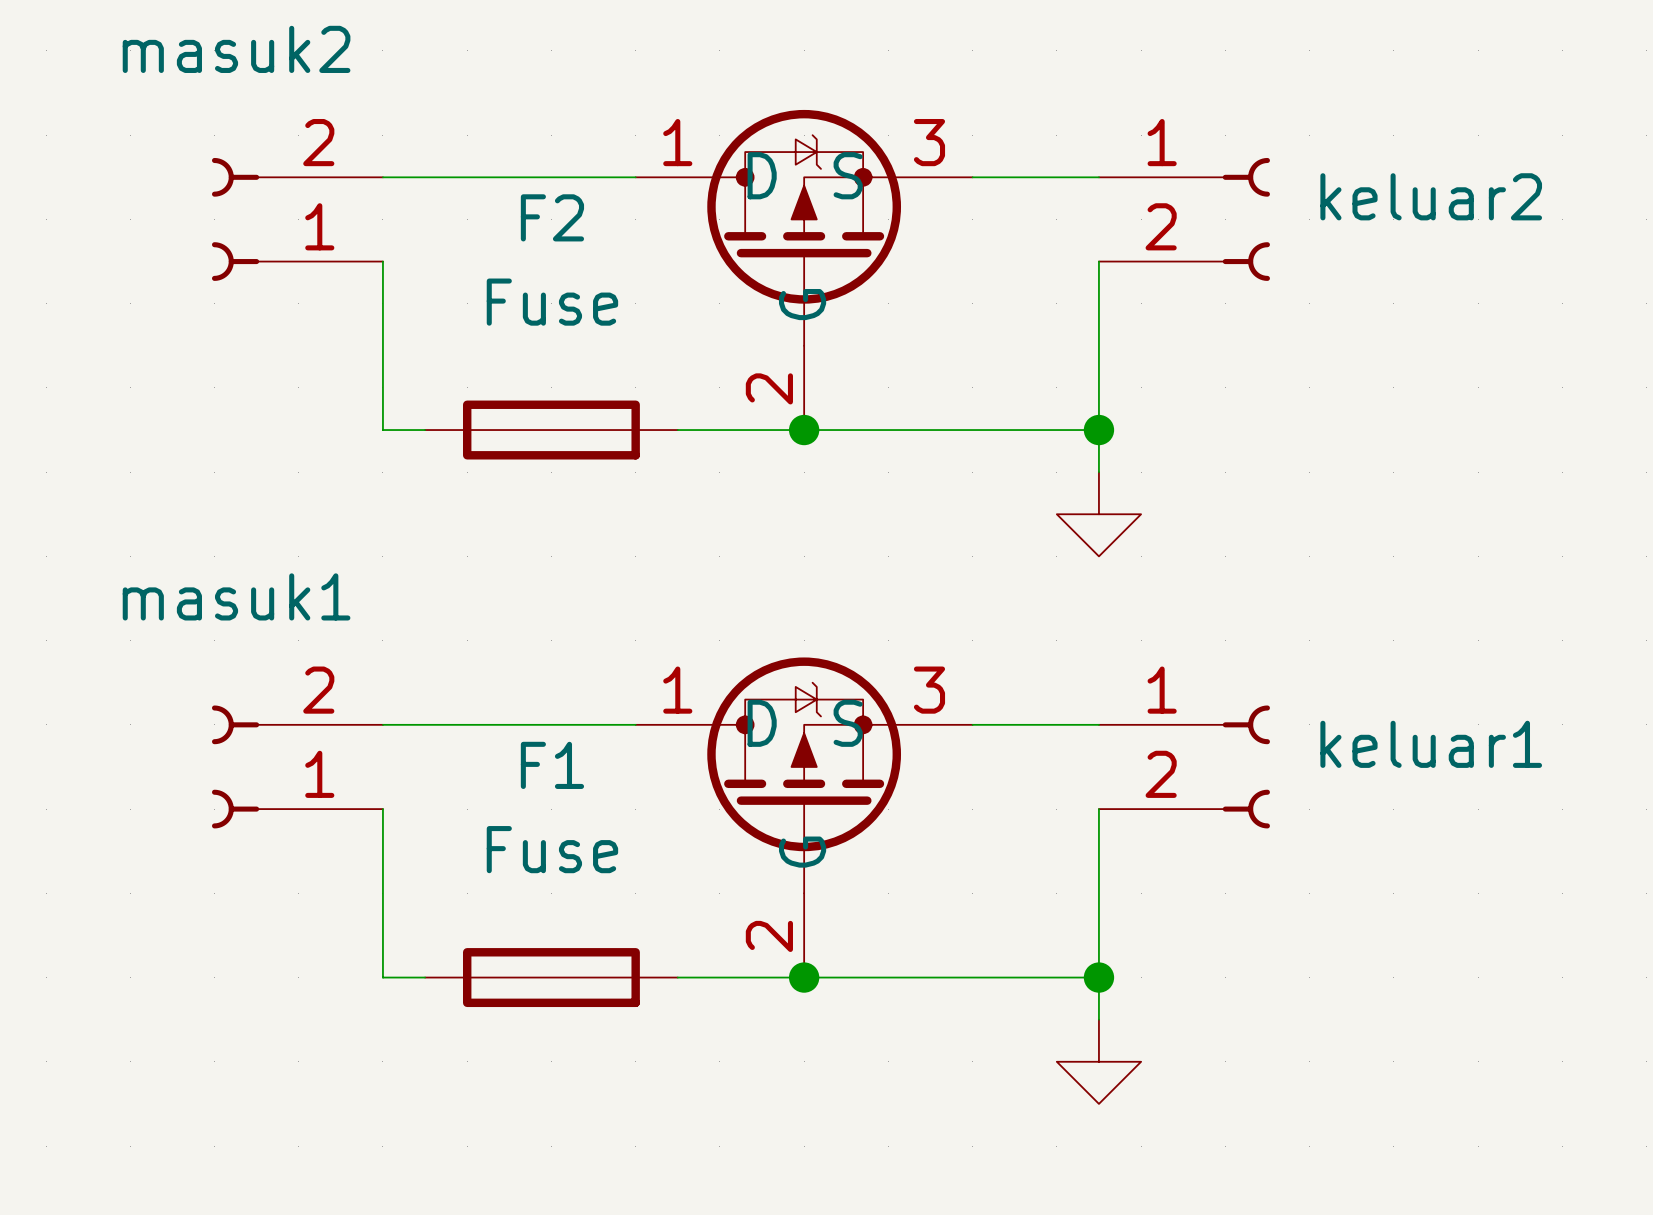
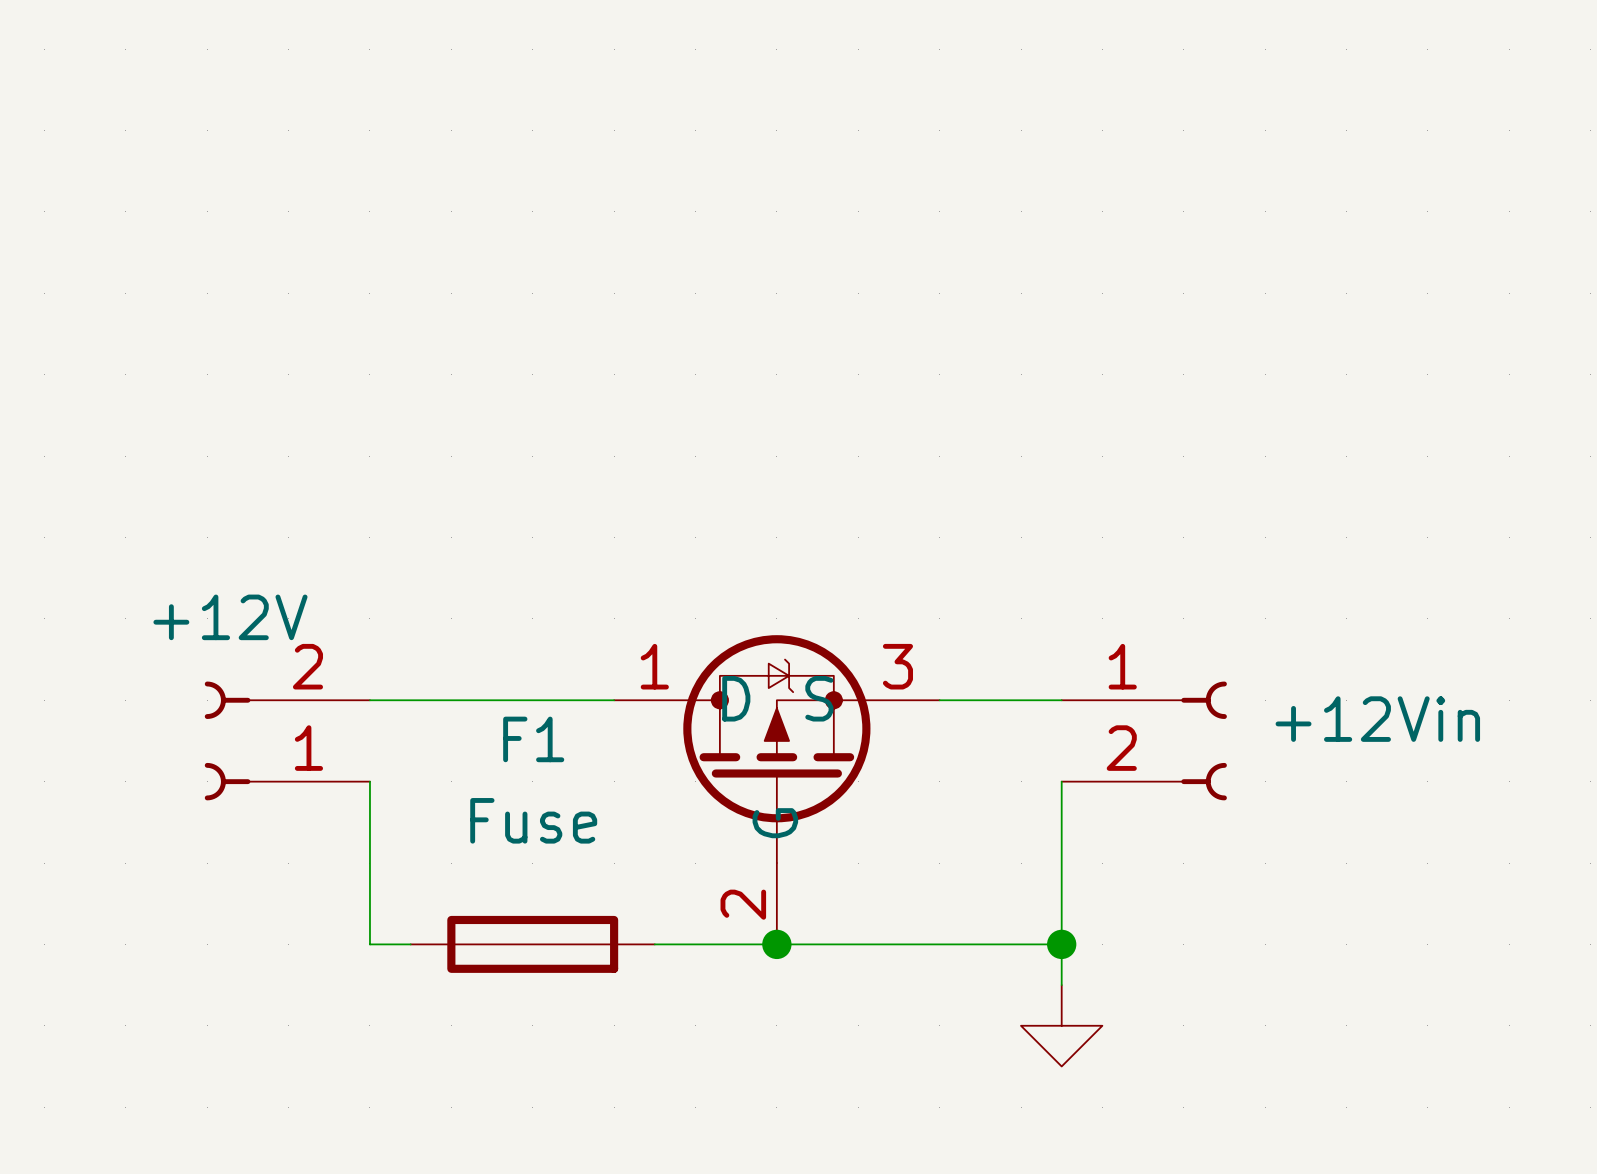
wire: (382, 177) (635, 177) -> none
wire: (972, 177) (1098, 177) -> none
masuk2: (297, 219) -> none
keluar2: (1184, 219) -> none
wire: (382, 261) (382, 430) (425, 430) -> none
wire: (1098, 261) (1098, 472) -> none
part: (804, 269) -> none
F2: Fuse (551, 430) -> none
wire: (677, 430) (1098, 430) -> none
junction: (804, 430) -> none
junction: (1098, 430) -> none
power symbol: (1098, 514) -> none
masuk1 name: masuk1 (236, 596) -> +12V (230, 617)
keluar1 name: keluar1 (1431, 744) -> +12Vin (1377, 719)

